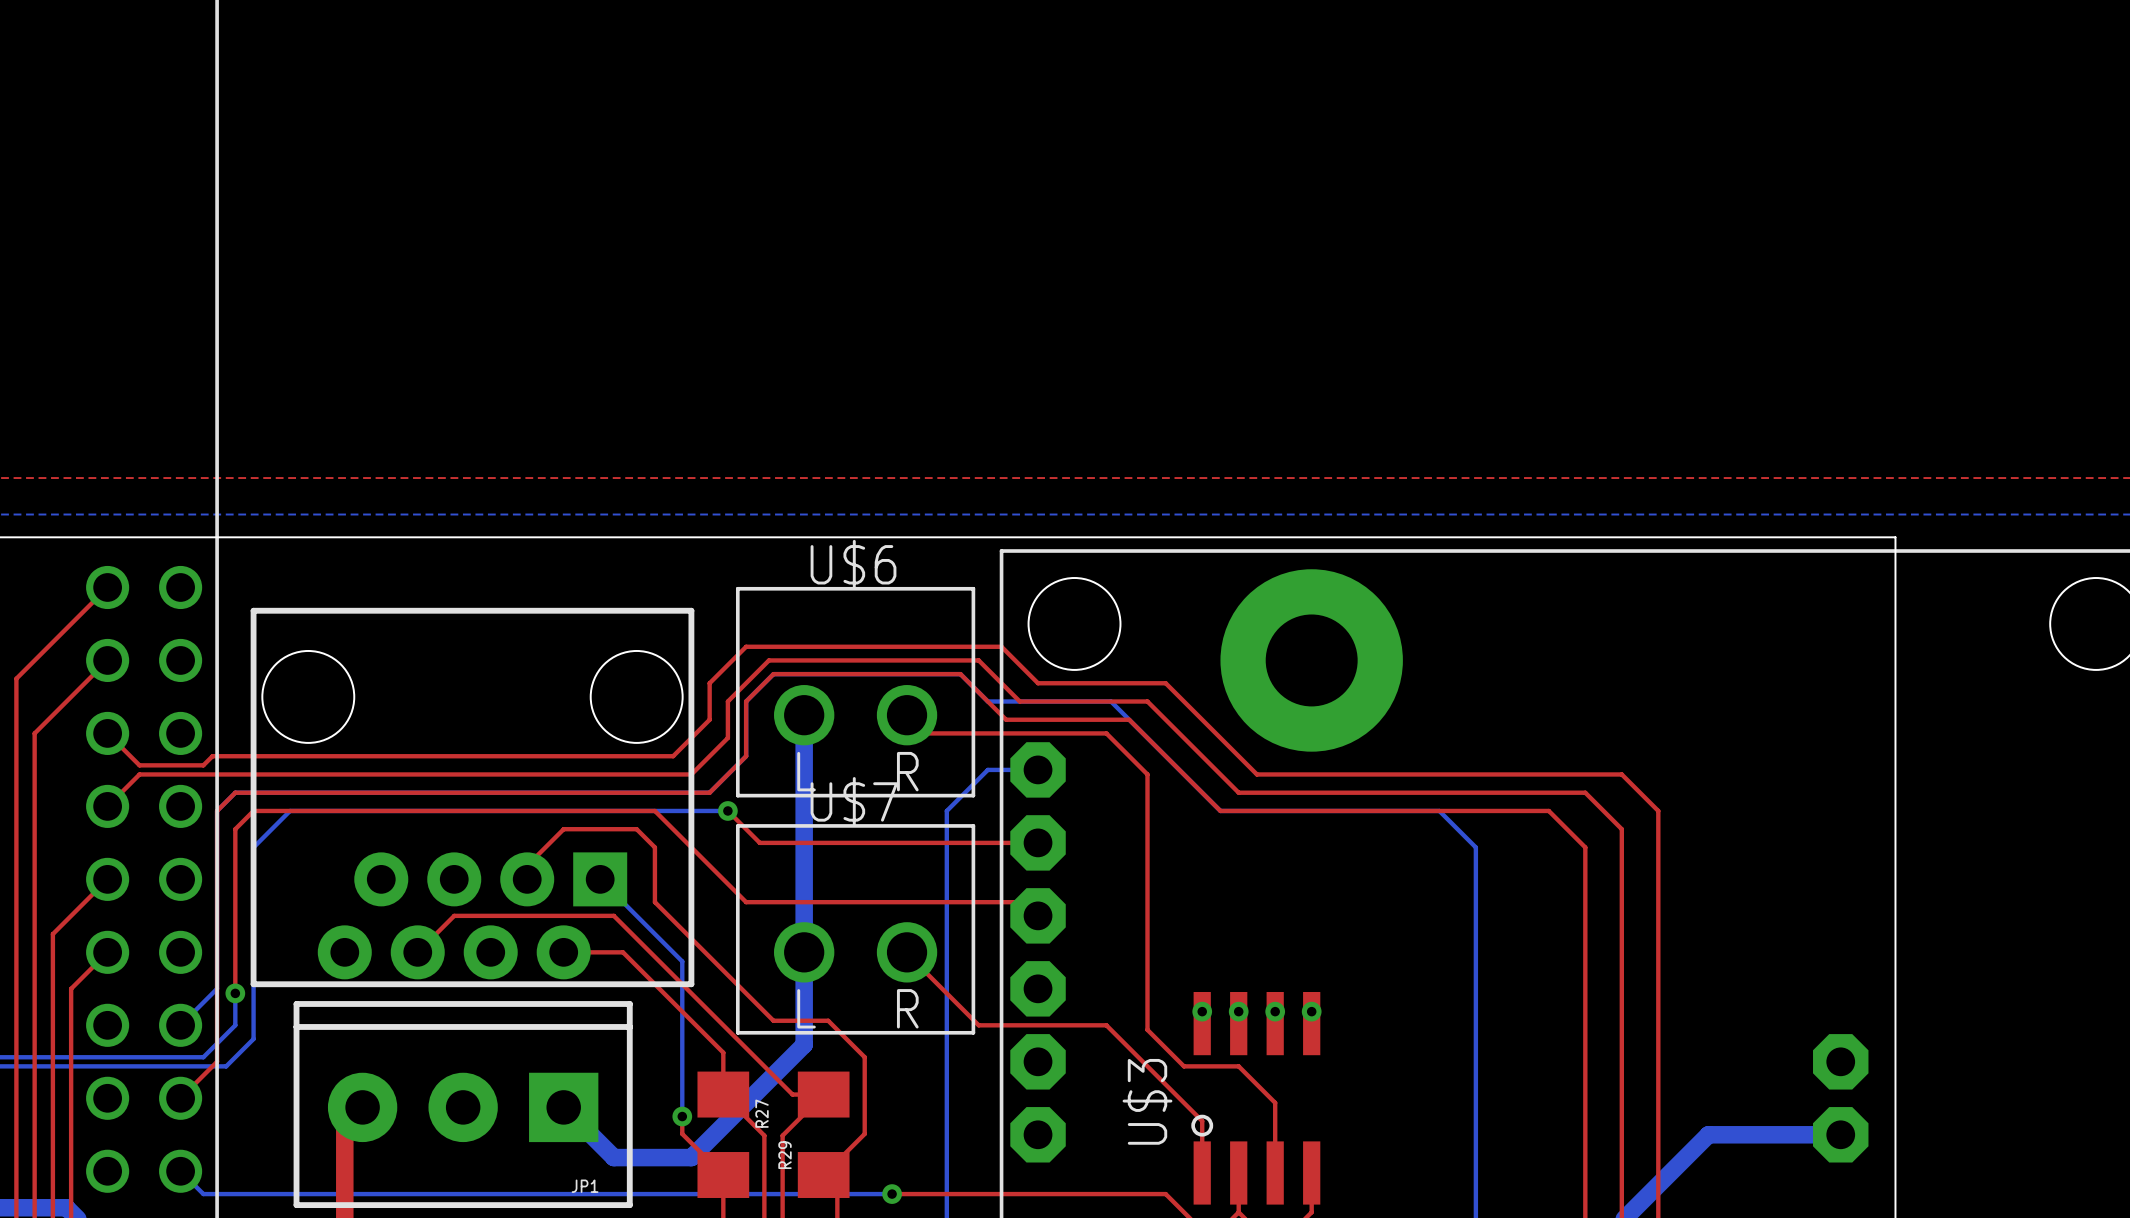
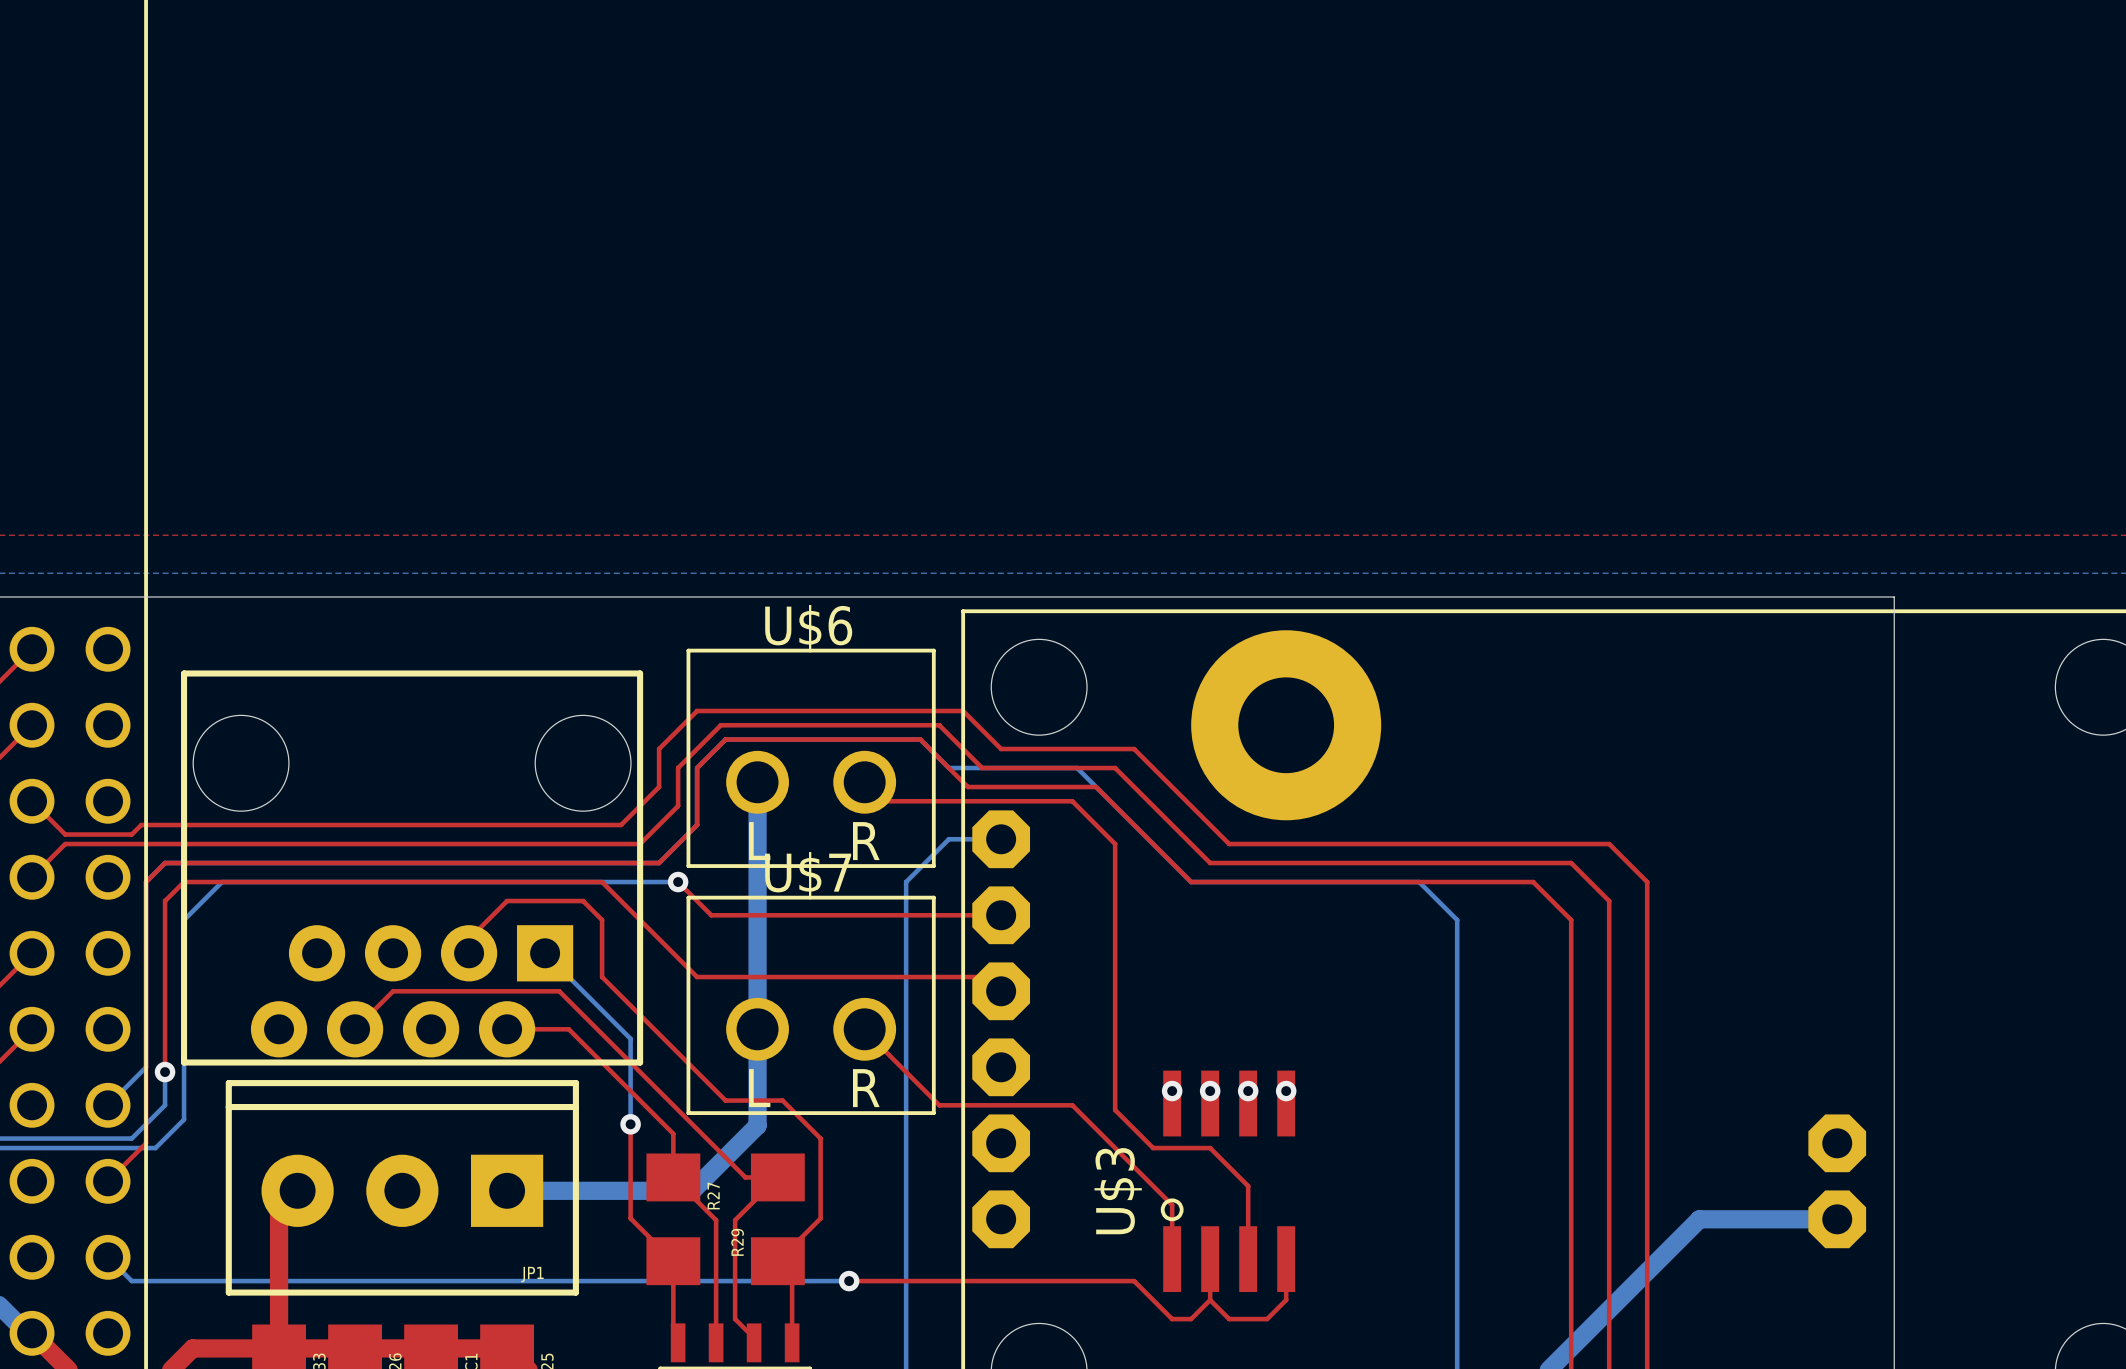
top track: none -> (630, 1124) (630, 1200)
bottom track: (682, 1043) (682, 1116) -> none
bottom track: (563, 1107) (613, 1157) (691, 1157) (741, 1107) -> (507, 1190) (692, 1190)
via position: (682, 1116) -> (630, 1124)

